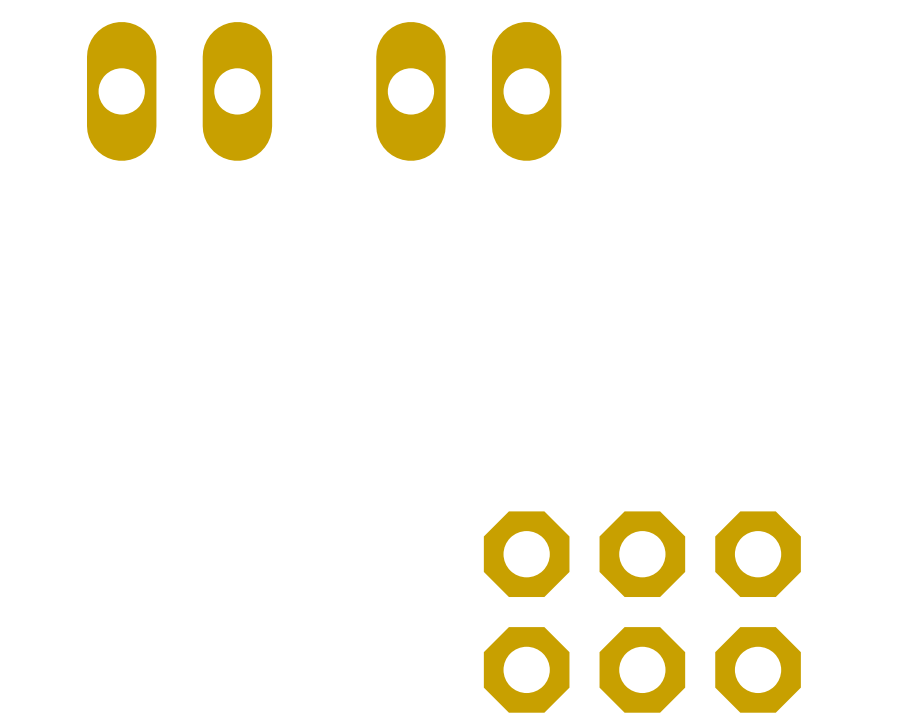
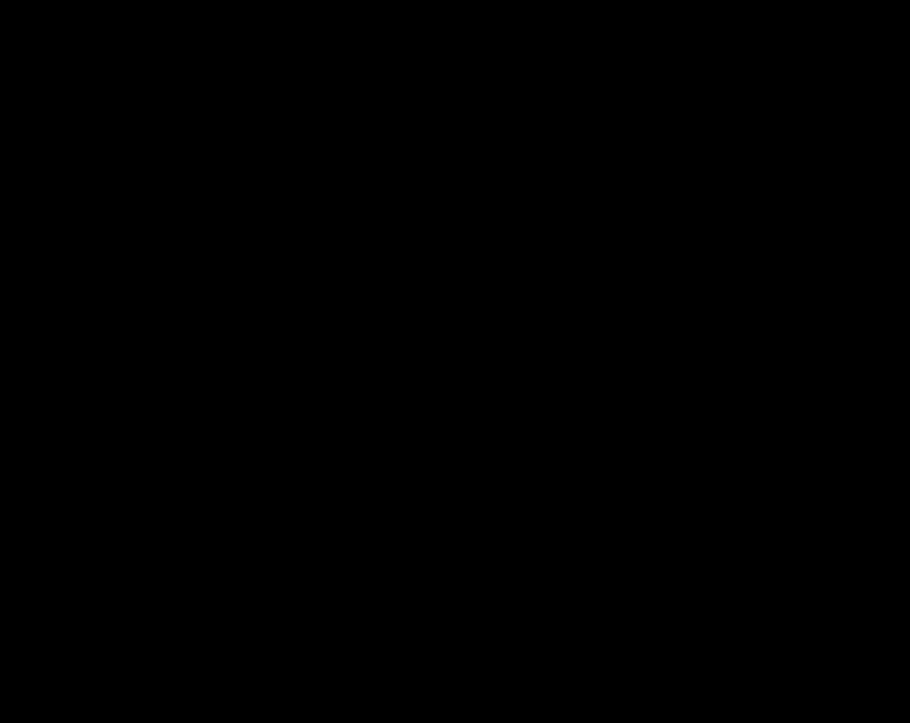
part: (179, 91) -> none
part: (468, 91) -> none
part: (642, 612) -> none

